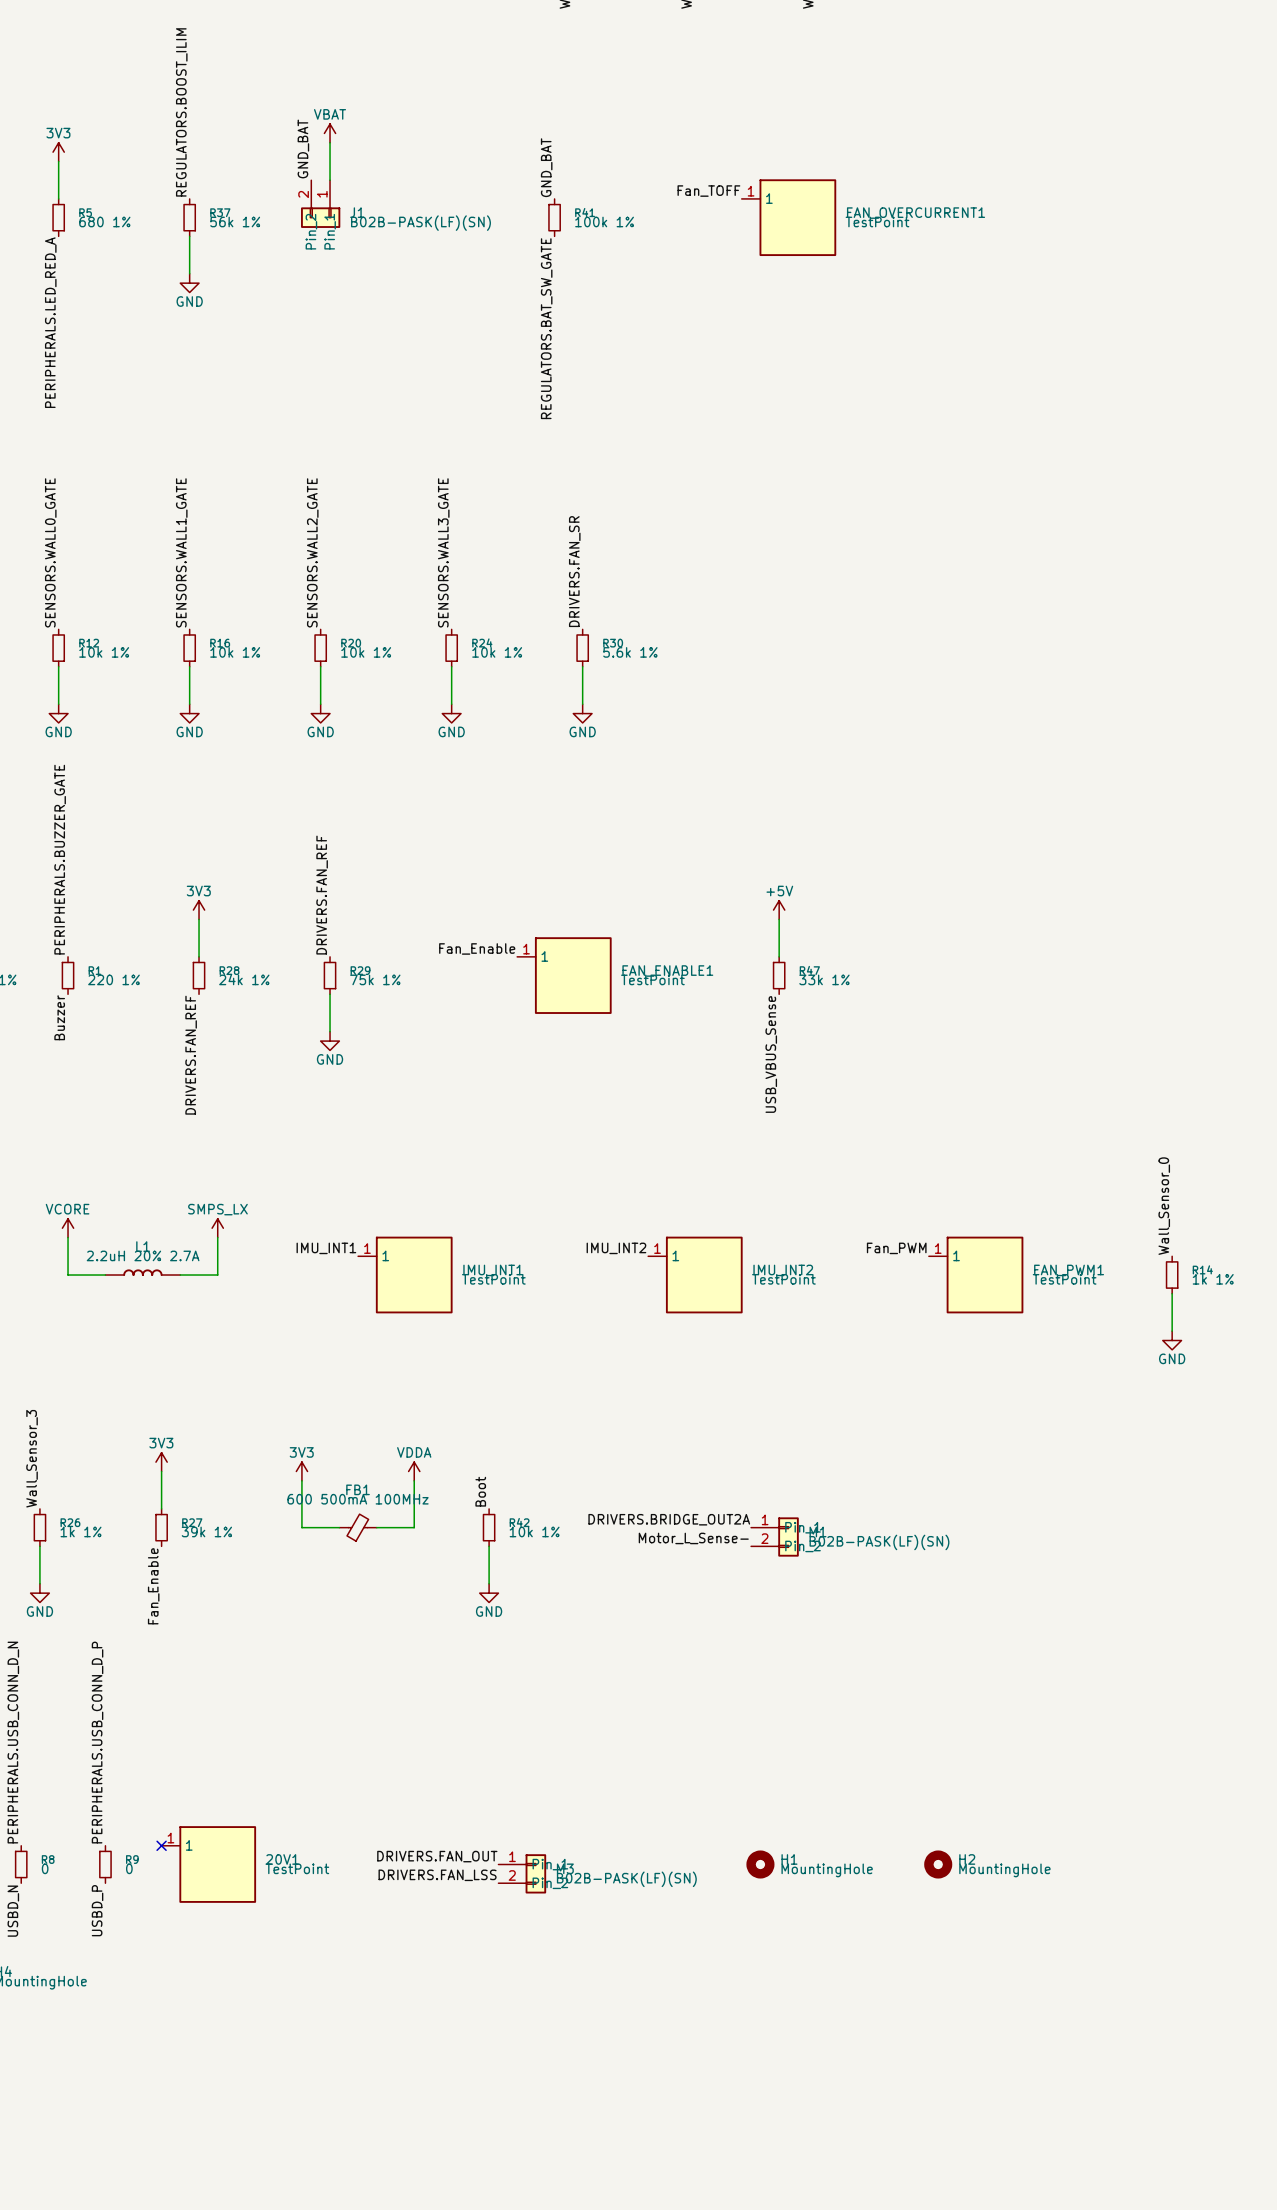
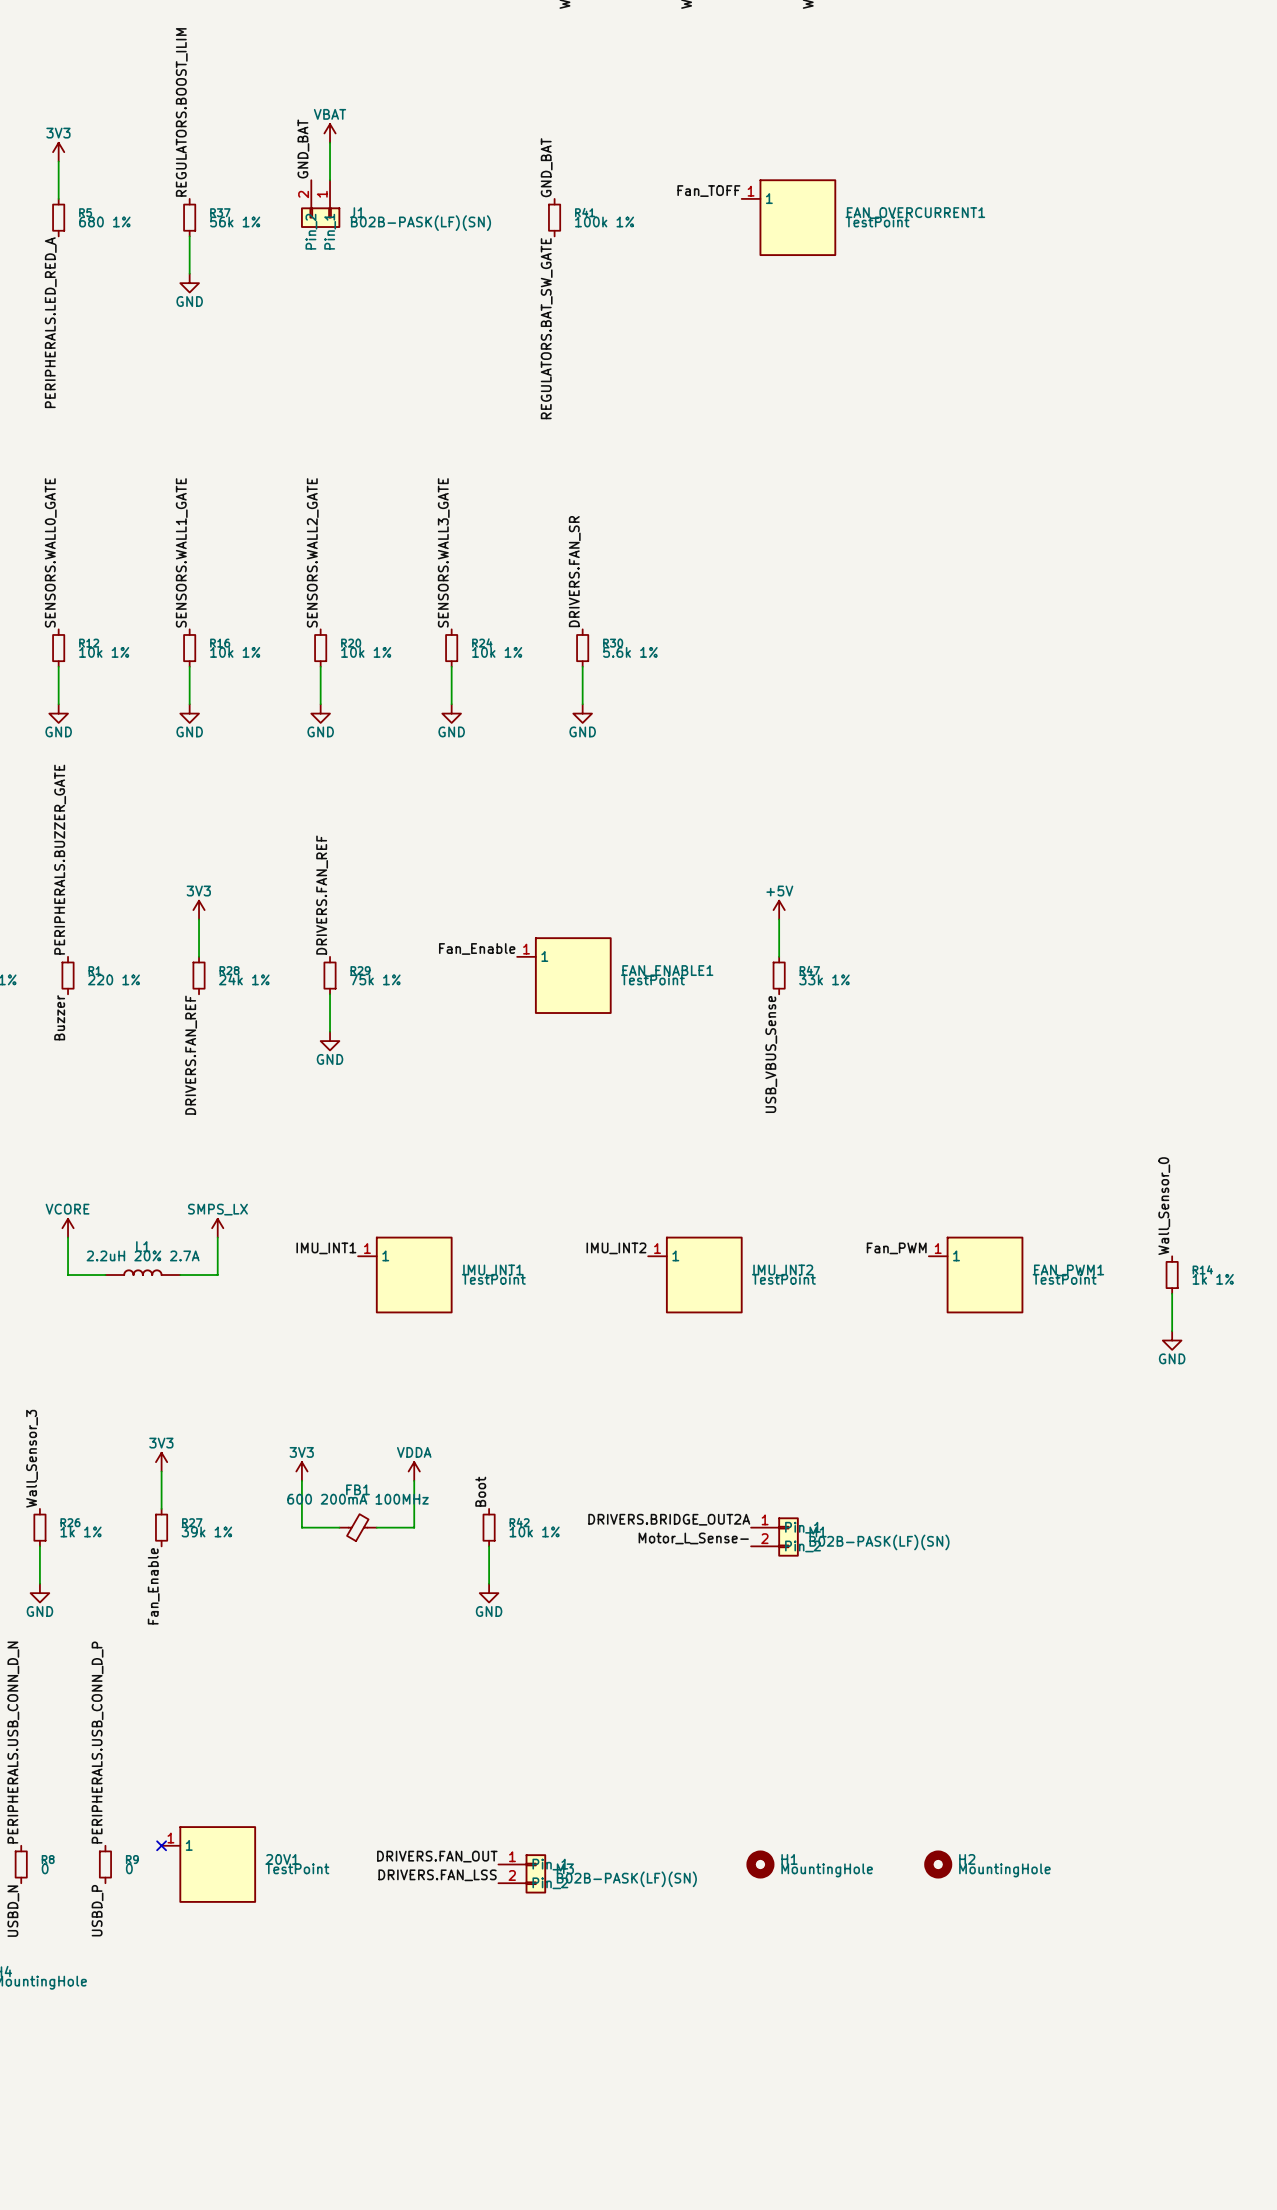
FB1 value: 600 500mA 100MHz (358, 1499) -> 600 200mA 100MHz (358, 1499)

